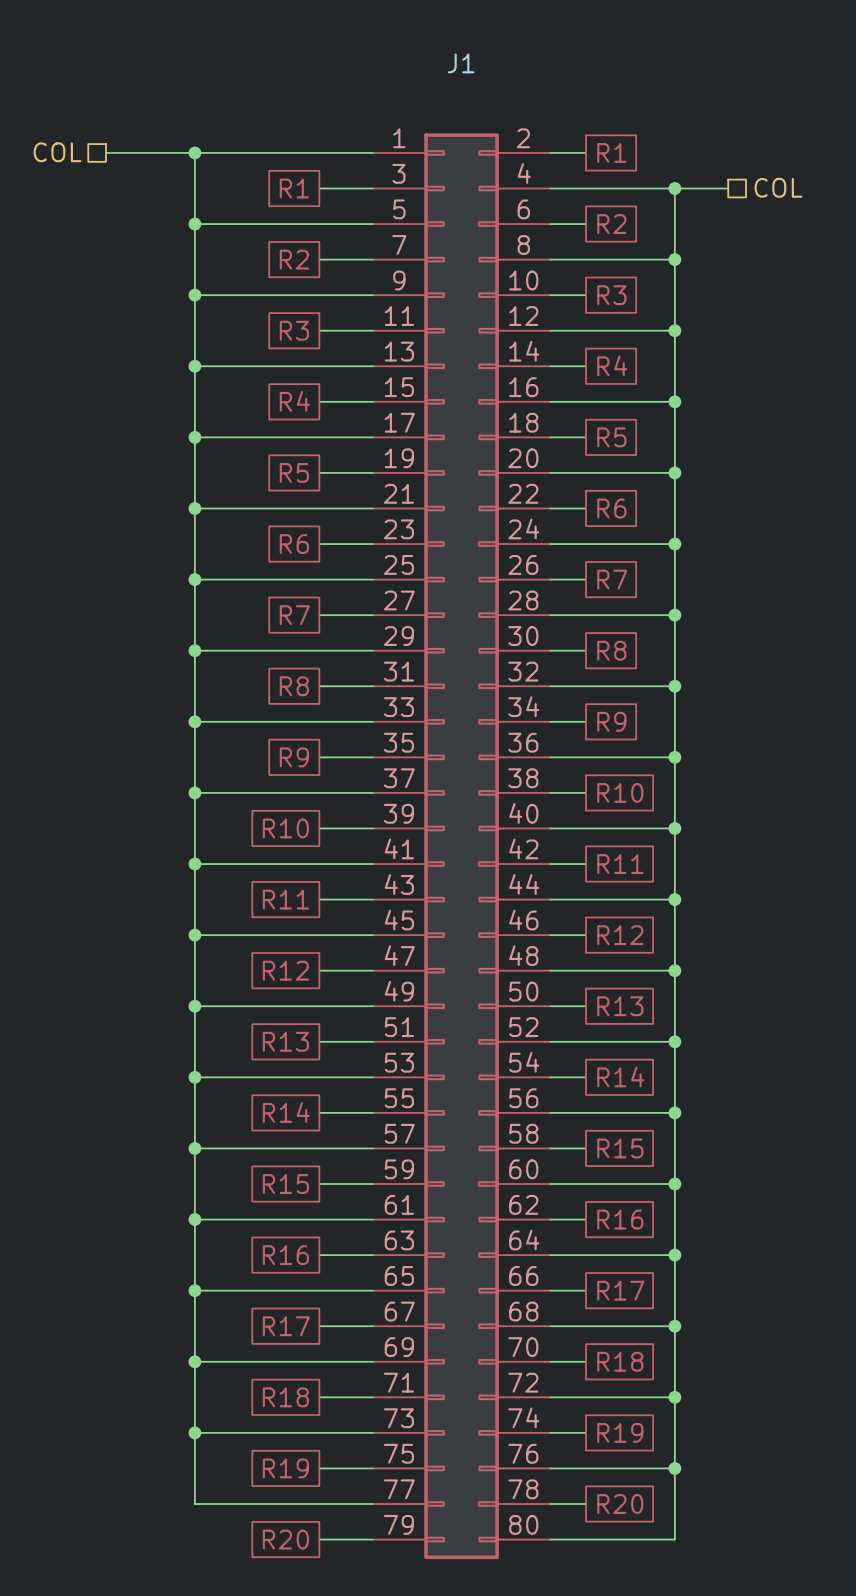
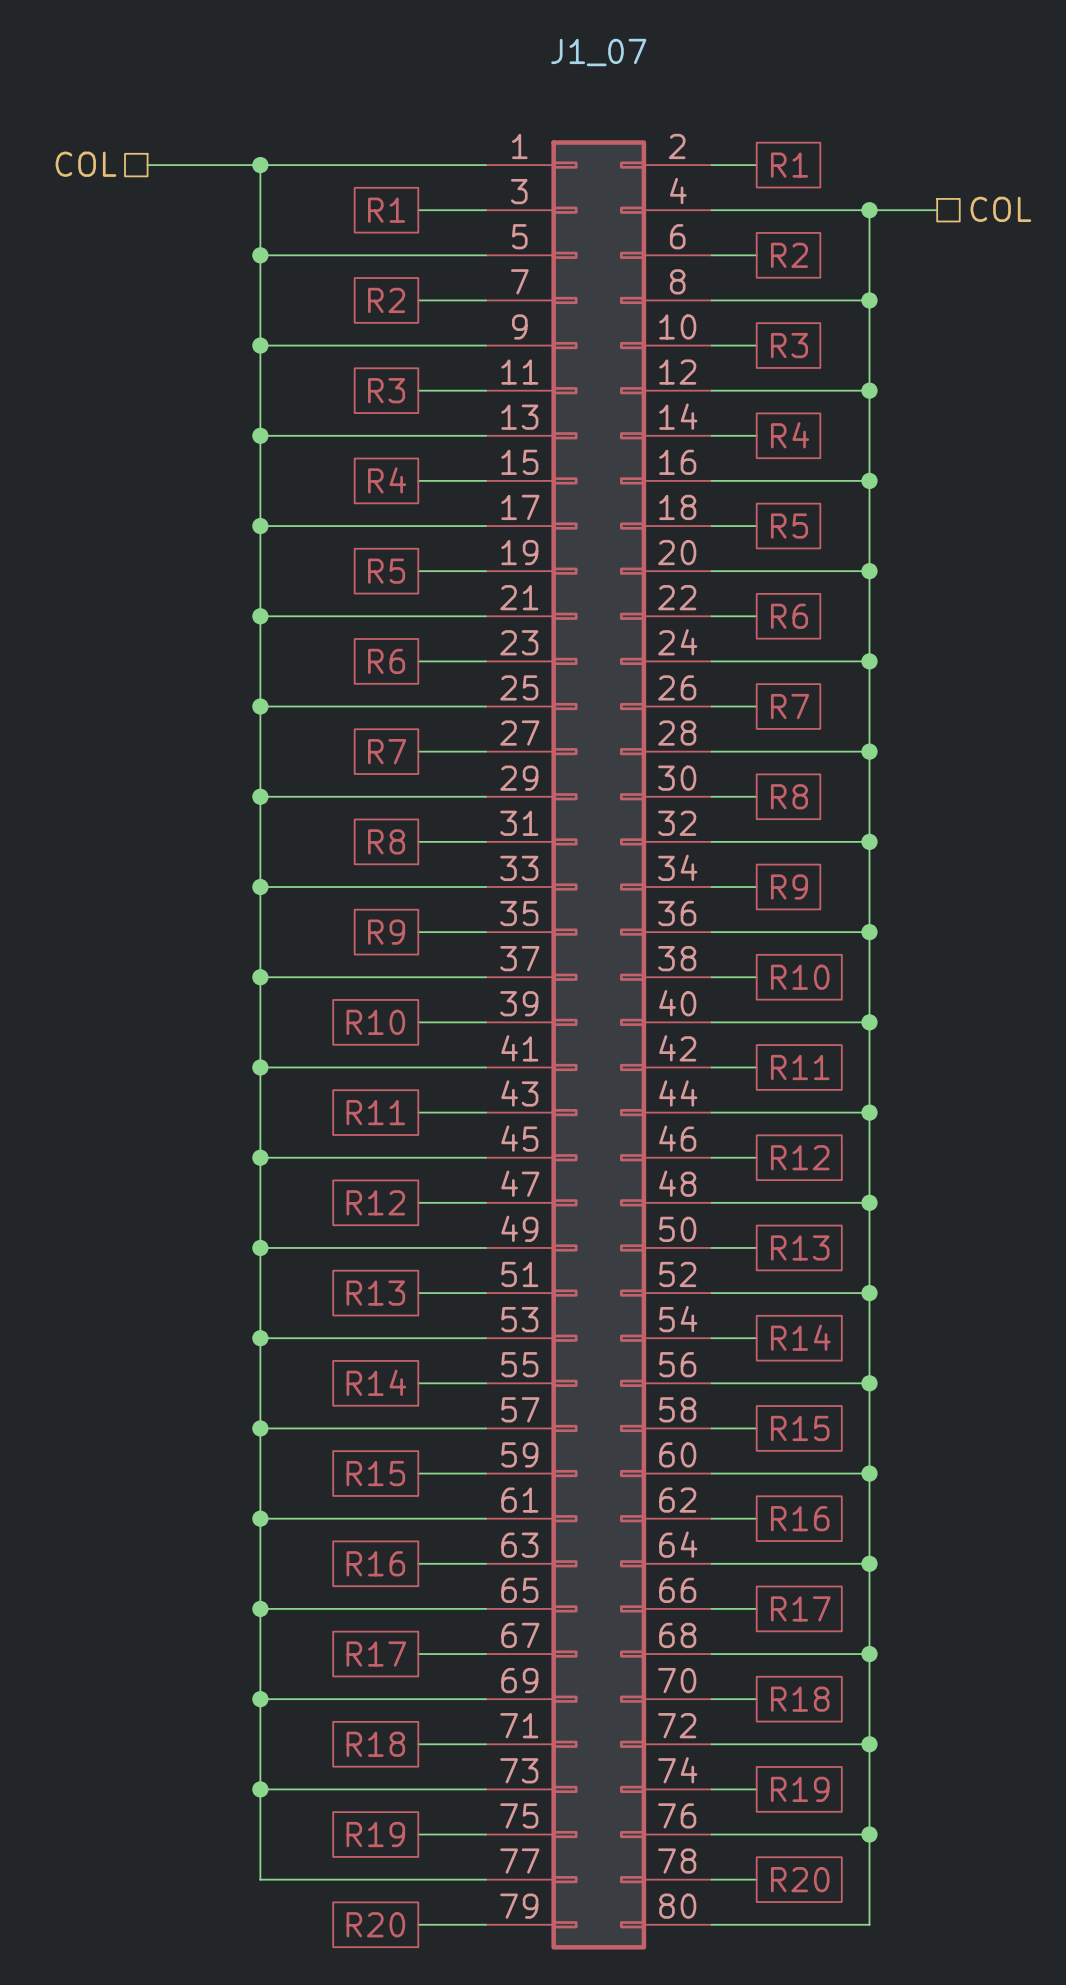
J1 name: J1 (461, 63) -> J1_07 (598, 52)

